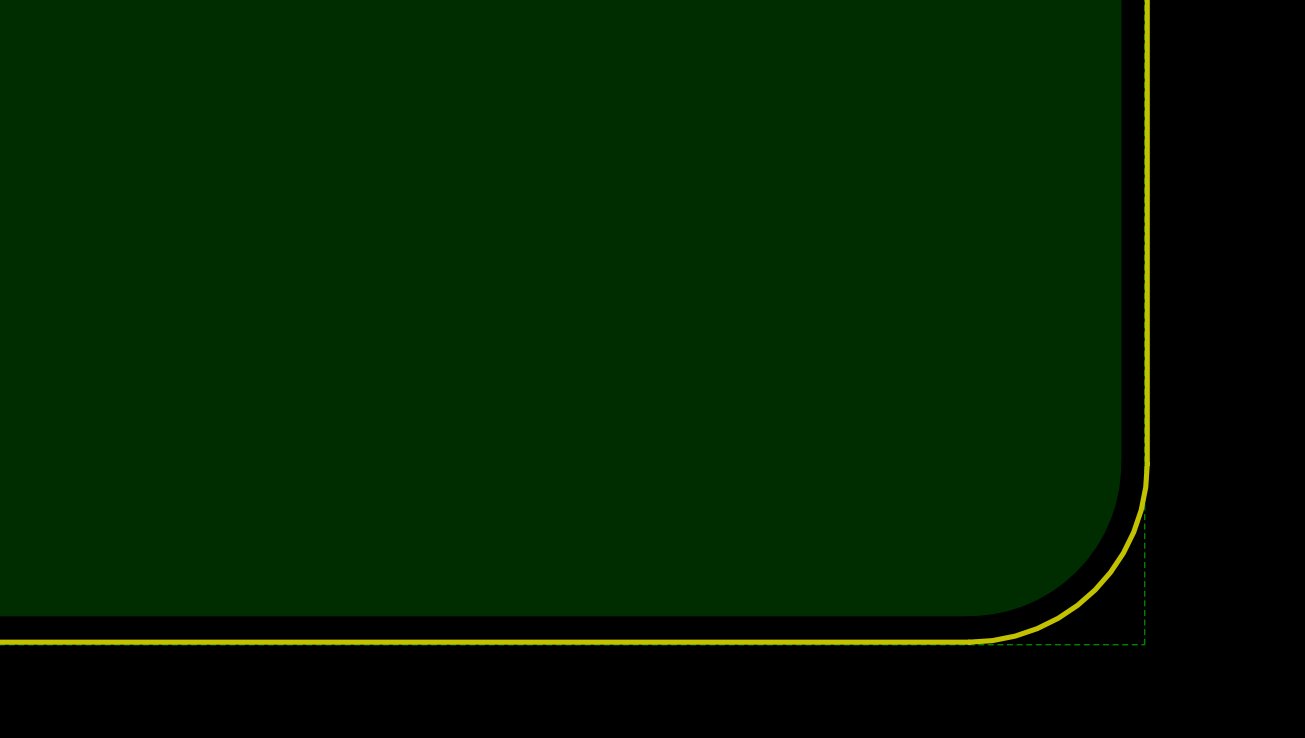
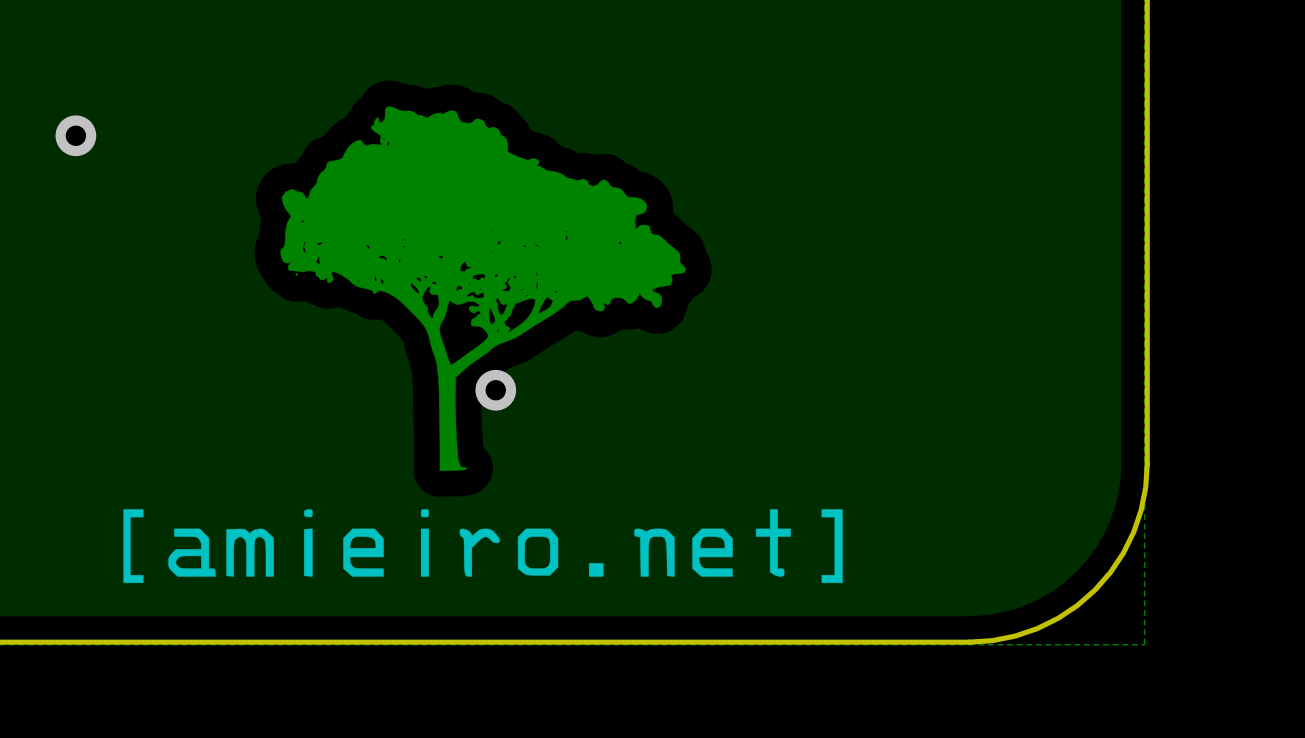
drawing: none -> [123, 106, 843, 584]
via: none -> (75, 135)
via: none -> (495, 390)

